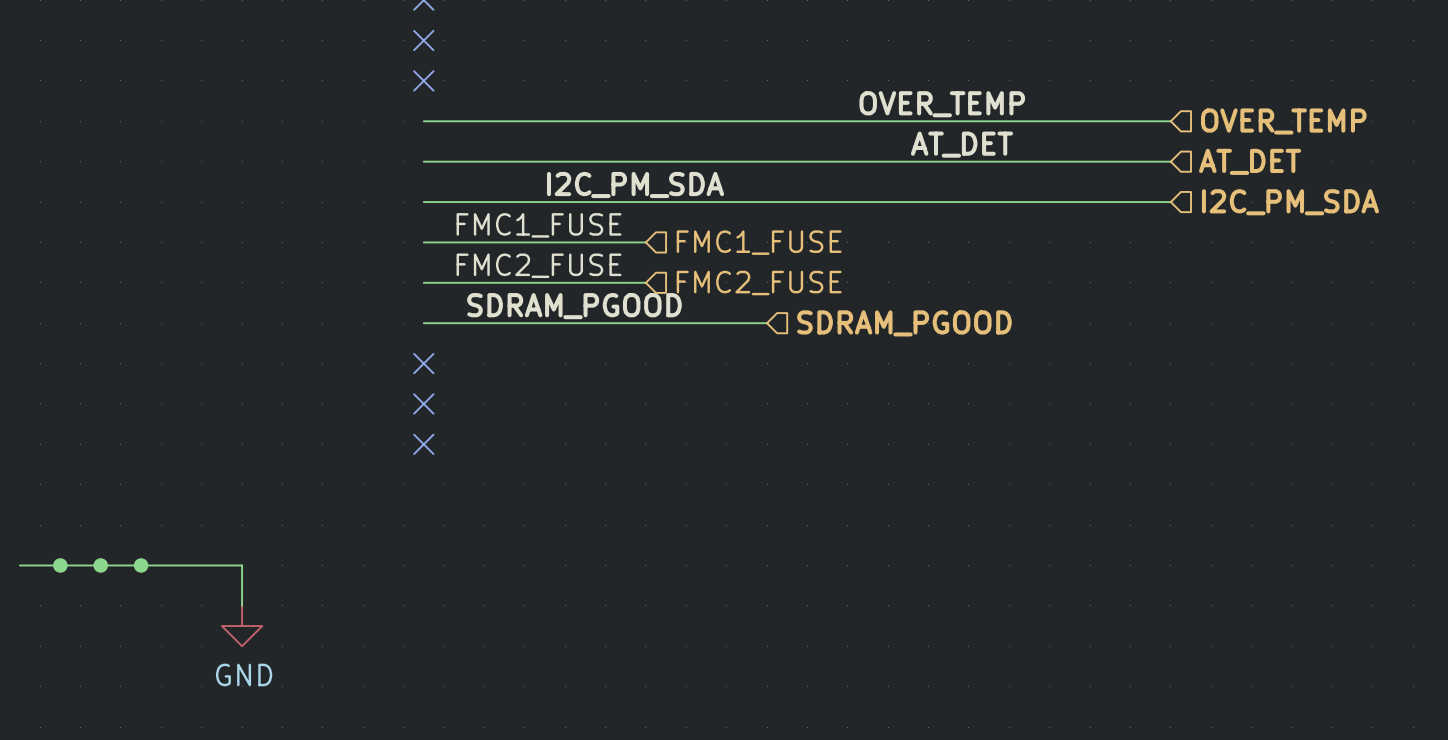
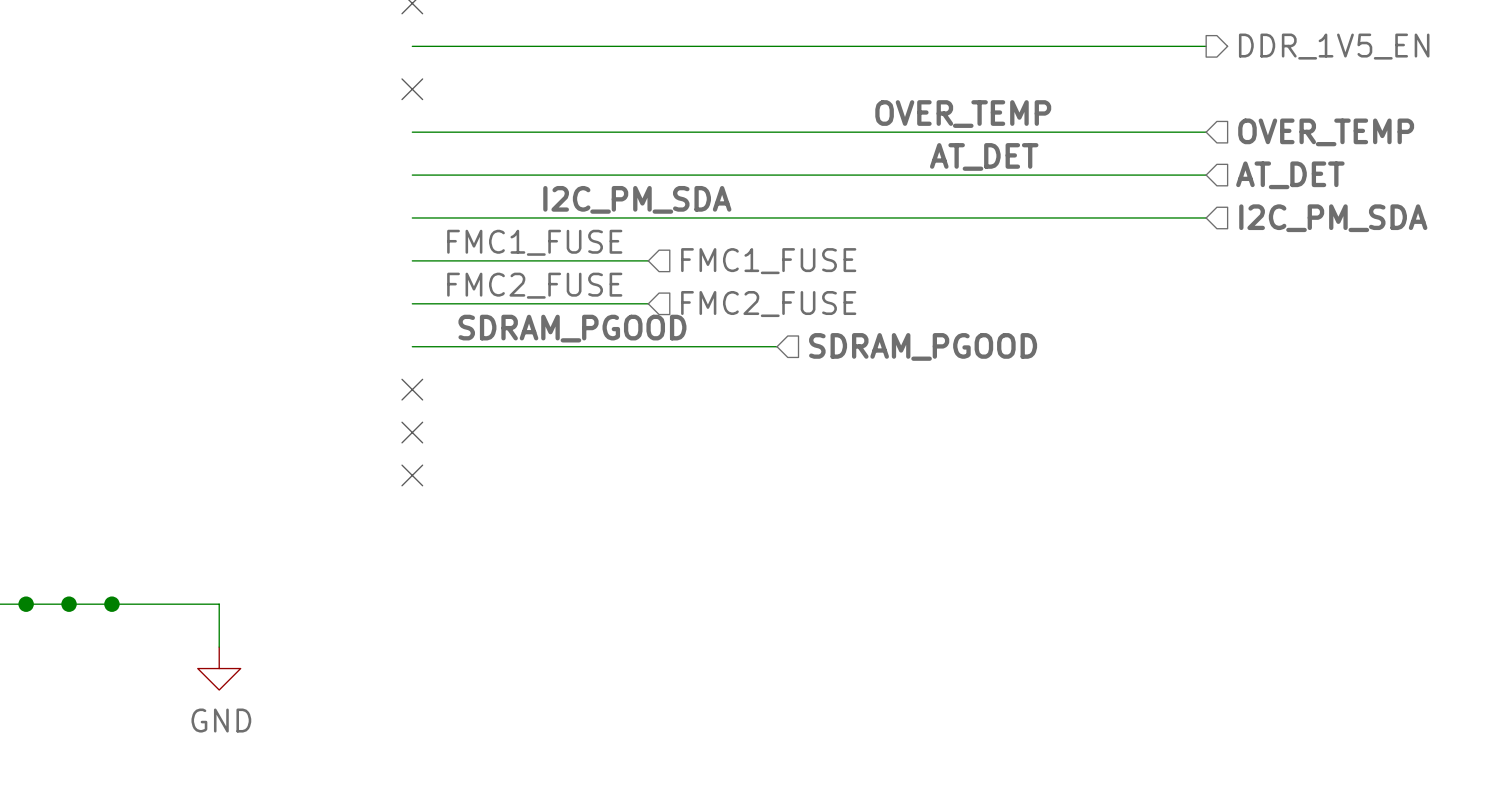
wire: none -> (412, 46) (1206, 46)
no-connect mark: (423, 40) -> none
hierarchical label: none -> DDR_1V5_EN (1334, 46)

